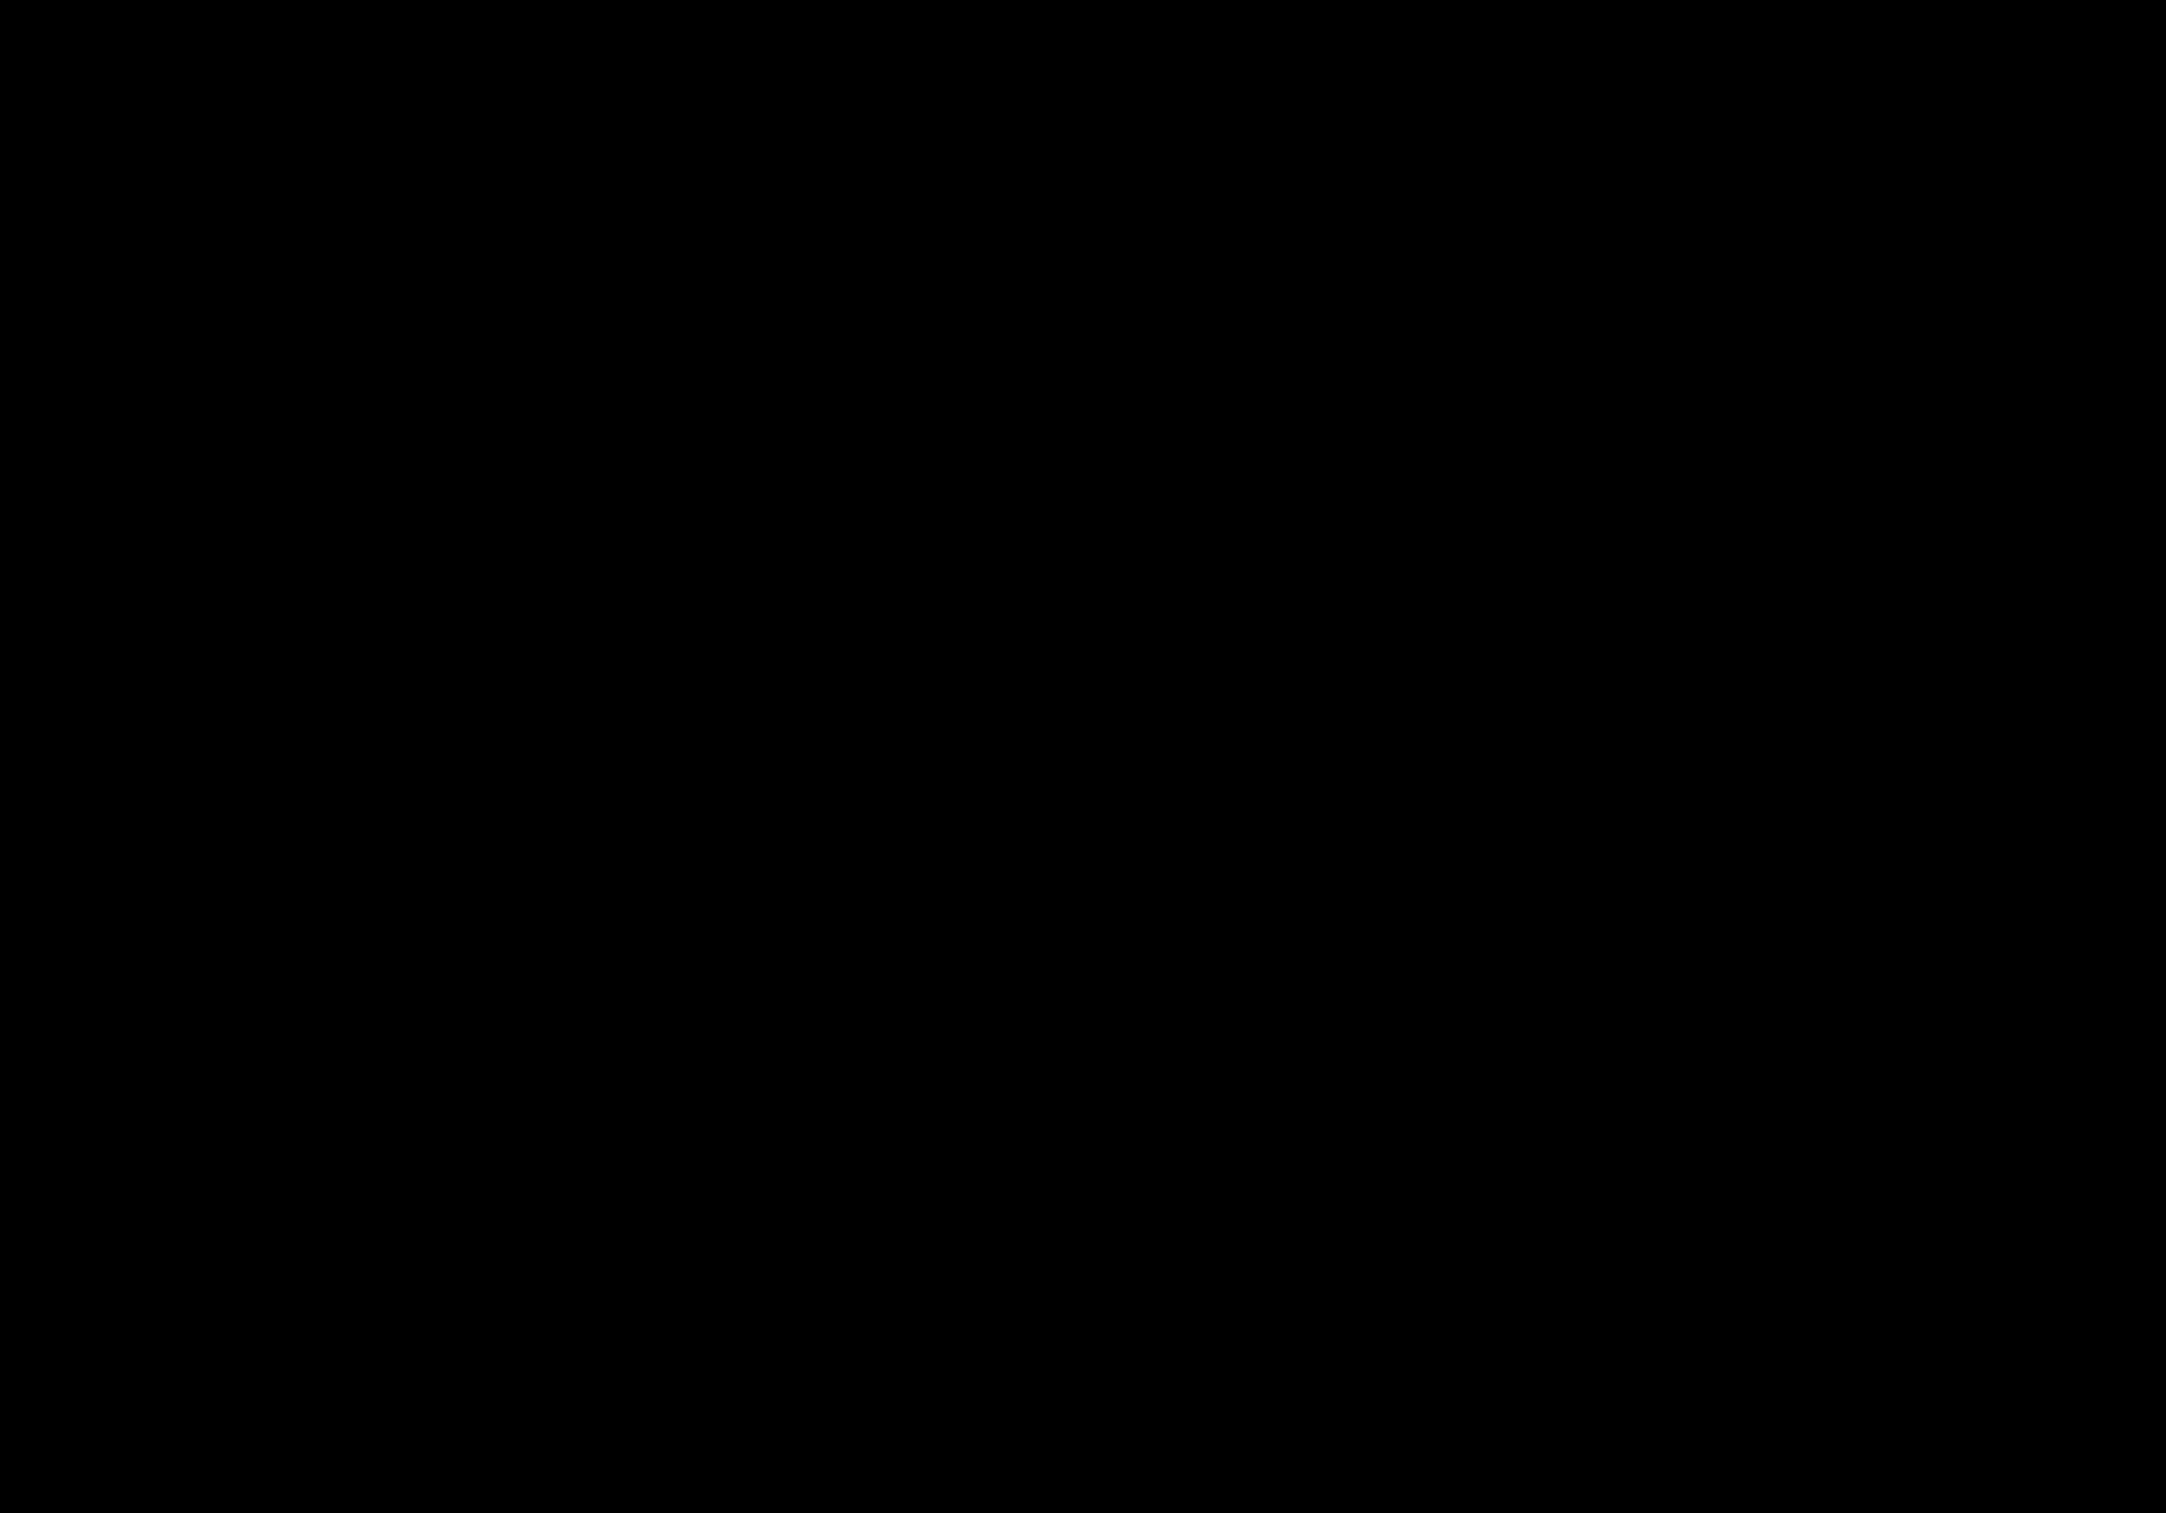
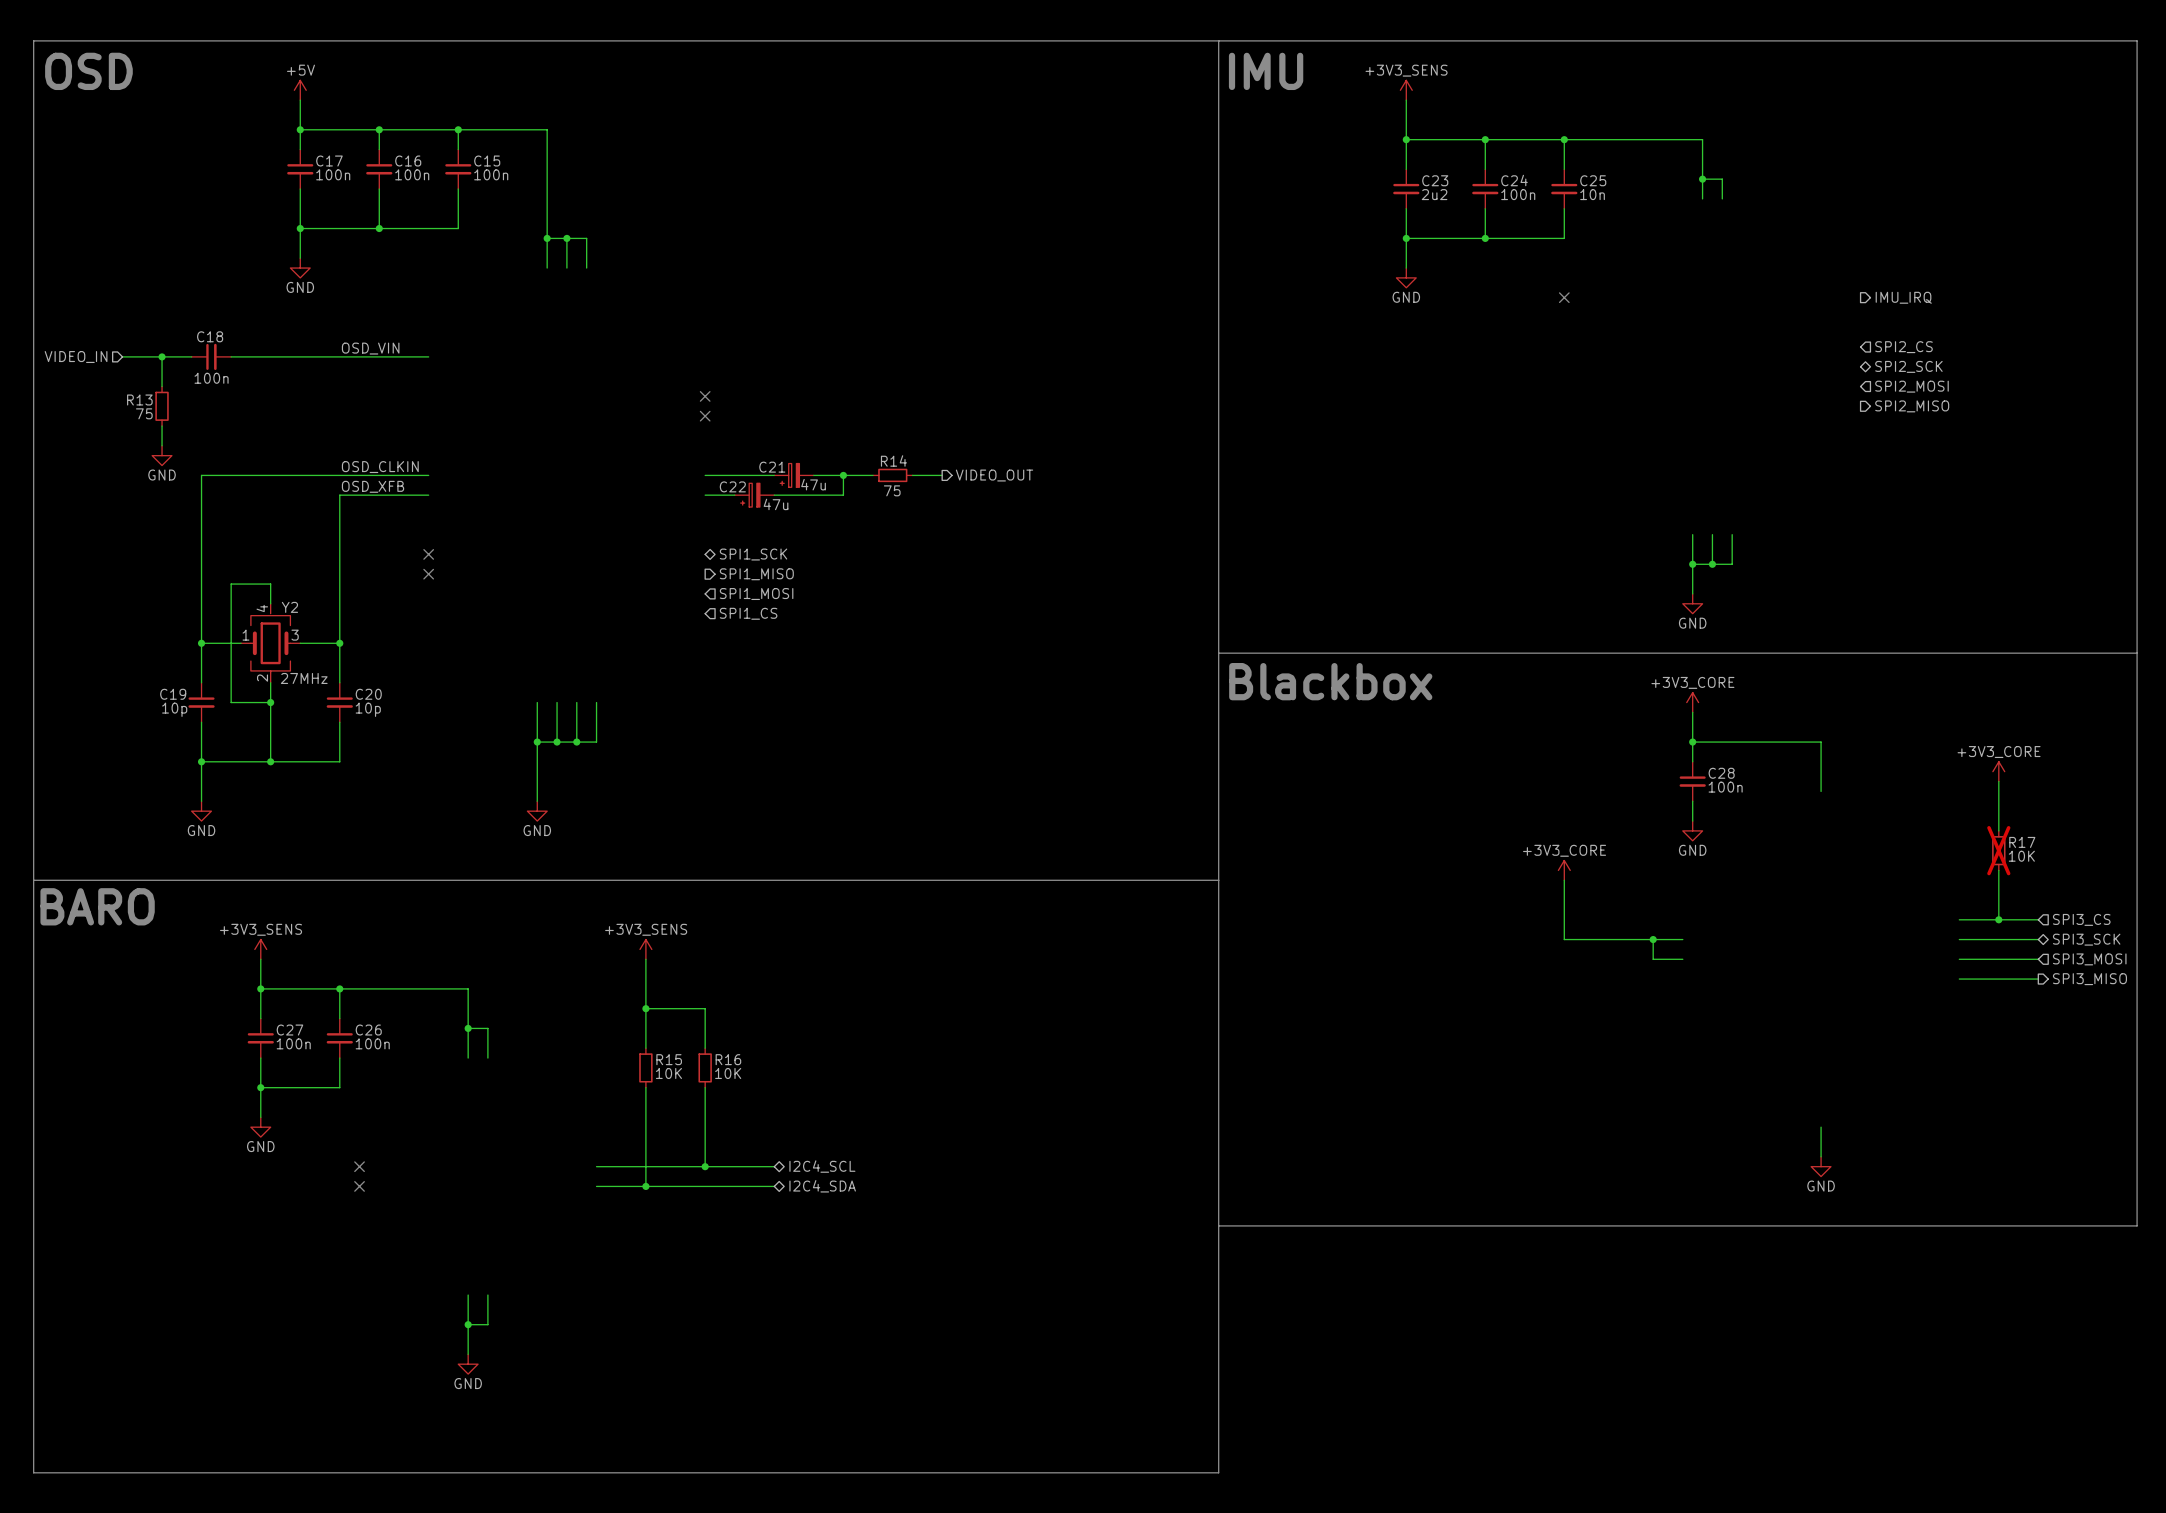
line: none -> (1218, 40) (1218, 1472) (33, 1472) (33, 40) (2137, 40) (2137, 1225) (1218, 1225)
text: none -> OSD (88, 71)
text: none -> IMU (1266, 71)
power symbol: none -> +5V (300, 90)
power symbol: none -> +3V3_SENS (1406, 90)
wire: none -> (300, 100) (300, 149)
wire: none -> (1406, 100) (1406, 169)
wire: none -> (300, 129) (547, 129) (547, 268)
junction: none -> (300, 129)
wire: none -> (379, 129) (379, 149)
junction: none -> (379, 129)
wire: none -> (458, 129) (458, 149)
junction: none -> (458, 129)
wire: none -> (1406, 139) (1702, 139) (1702, 198)
junction: none -> (1406, 139)
wire: none -> (1485, 139) (1485, 169)
junction: none -> (1485, 139)
wire: none -> (1564, 139) (1564, 169)
junction: none -> (1564, 139)
C17: none -> 100n (300, 169)
C16: none -> 100n (379, 169)
C15: none -> 100n (458, 169)
wire: none -> (1702, 179) (1722, 179) (1722, 198)
junction: none -> (1702, 179)
wire: none -> (300, 189) (300, 258)
wire: none -> (379, 189) (379, 228)
wire: none -> (458, 189) (458, 228) (300, 228)
C23: none -> 2u2 (1406, 189)
C24: none -> 100n (1485, 189)
C25: none -> 10n (1564, 189)
wire: none -> (1406, 208) (1406, 268)
wire: none -> (1485, 208) (1485, 238)
wire: none -> (1564, 208) (1564, 238) (1406, 238)
junction: none -> (300, 228)
junction: none -> (379, 228)
wire: none -> (547, 238) (586, 238) (586, 268)
junction: none -> (547, 238)
wire: none -> (566, 238) (566, 268)
junction: none -> (566, 238)
junction: none -> (1406, 238)
junction: none -> (1485, 238)
power symbol: none -> GND (300, 268)
power symbol: none -> GND (1406, 277)
no-connect mark: none -> (1564, 297)
hierarchical label: none -> IMU_IRQ (1903, 297)
hierarchical label: none -> SPI2_CS (1903, 347)
label: none -> OSD_VIN (370, 348)
wire: none -> (122, 356) (191, 356)
wire: none -> (162, 356) (162, 386)
junction: none -> (162, 356)
C18: none -> 100n (211, 356)
wire: none -> (231, 356) (428, 356)
hierarchical label: none -> VIDEO_IN (76, 357)
hierarchical label: none -> SPI2_SCK (1908, 366)
hierarchical label: none -> SPI2_MOSI (1911, 386)
no-connect mark: none -> (705, 396)
R13: none -> 75 (162, 406)
hierarchical label: none -> SPI2_MISO (1912, 406)
no-connect mark: none -> (705, 416)
wire: none -> (162, 426) (162, 445)
power symbol: none -> GND (162, 455)
label: none -> OSD_CLKIN (380, 467)
wire: none -> (428, 475) (201, 475) (201, 682)
wire: none -> (705, 475) (774, 475)
C21: none -> 47u (794, 475)
wire: none -> (813, 475) (873, 475)
wire: none -> (843, 475) (843, 495) (774, 495)
junction: none -> (843, 475)
R14: none -> 75 (892, 475)
wire: none -> (912, 475) (942, 475)
hierarchical label: none -> VIDEO_OUT (994, 475)
label: none -> OSD_XFB (373, 486)
wire: none -> (428, 495) (339, 495) (339, 682)
wire: none -> (705, 495) (734, 495)
C22: none -> 47u (754, 495)
wire: none -> (1692, 534) (1692, 593)
wire: none -> (1712, 534) (1712, 564)
wire: none -> (1732, 534) (1732, 564) (1692, 564)
no-connect mark: none -> (428, 554)
hierarchical label: none -> SPI1_SCK (753, 554)
junction: none -> (1692, 564)
junction: none -> (1712, 564)
no-connect mark: none -> (428, 574)
hierarchical label: none -> SPI1_MISO (756, 574)
hierarchical label: none -> SPI1_MOSI (756, 594)
wire: none -> (270, 603) (270, 584) (231, 584) (231, 702) (270, 702)
power symbol: none -> GND (1692, 603)
hierarchical label: none -> SPI1_CS (748, 613)
wire: none -> (201, 643) (241, 643)
junction: none -> (201, 643)
Y2: none -> 27MHz (270, 643)
wire: none -> (300, 643) (339, 643)
junction: none -> (339, 643)
line: none -> (1218, 653) (2137, 653)
text: none -> Blackbox (1330, 681)
wire: none -> (270, 682) (270, 761)
C19: none -> 10p (201, 702)
junction: none -> (270, 702)
C20: none -> 10p (339, 702)
wire: none -> (537, 702) (537, 801)
wire: none -> (557, 702) (557, 742)
wire: none -> (576, 702) (576, 742)
wire: none -> (596, 702) (596, 742) (537, 742)
power symbol: none -> +3V3_CORE (1692, 702)
wire: none -> (1692, 712) (1692, 761)
wire: none -> (201, 722) (201, 801)
wire: none -> (339, 722) (339, 761) (201, 761)
junction: none -> (537, 742)
junction: none -> (557, 742)
junction: none -> (576, 742)
wire: none -> (1692, 742) (1821, 742) (1821, 791)
junction: none -> (1692, 742)
junction: none -> (201, 761)
junction: none -> (270, 761)
power symbol: none -> +3V3_CORE (1998, 771)
C28: none -> 100n (1692, 781)
wire: none -> (1998, 781) (1998, 830)
wire: none -> (1692, 801) (1692, 821)
power symbol: none -> GND (201, 811)
power symbol: none -> GND (537, 811)
power symbol: none -> GND (1692, 830)
R17: none -> 10K (1998, 850)
power symbol: none -> +3V3_CORE (1564, 870)
wire: none -> (1998, 870) (1998, 919)
line: none -> (33, 880) (1218, 880)
wire: none -> (1564, 880) (1564, 939) (1682, 939)
text: none -> BARO (97, 906)
wire: none -> (1959, 919) (2038, 919)
junction: none -> (1998, 919)
hierarchical label: none -> SPI3_CS (2081, 919)
wire: none -> (1653, 939) (1653, 959) (1682, 959)
junction: none -> (1653, 939)
wire: none -> (1959, 939) (2038, 939)
hierarchical label: none -> SPI3_SCK (2086, 939)
power symbol: none -> +3V3_SENS (260, 949)
power symbol: none -> +3V3_SENS (645, 949)
wire: none -> (260, 959) (260, 1018)
wire: none -> (645, 959) (645, 1048)
wire: none -> (1959, 959) (2038, 959)
hierarchical label: none -> SPI3_MOSI (2089, 959)
wire: none -> (1959, 979) (2038, 979)
hierarchical label: none -> SPI3_MISO (2089, 979)
wire: none -> (260, 988) (468, 988) (468, 1058)
junction: none -> (260, 988)
wire: none -> (339, 988) (339, 1018)
junction: none -> (339, 988)
wire: none -> (645, 1008) (705, 1008) (705, 1048)
junction: none -> (645, 1008)
wire: none -> (468, 1028) (487, 1028) (487, 1058)
junction: none -> (468, 1028)
C27: none -> 100n (260, 1038)
C26: none -> 100n (339, 1038)
wire: none -> (260, 1058) (260, 1117)
wire: none -> (339, 1058) (339, 1087) (260, 1087)
R15: none -> 10K (645, 1067)
R16: none -> 10K (705, 1067)
junction: none -> (260, 1087)
wire: none -> (645, 1087) (645, 1186)
wire: none -> (705, 1087) (705, 1166)
power symbol: none -> GND (260, 1127)
wire: none -> (1821, 1127) (1821, 1156)
no-connect mark: none -> (359, 1166)
wire: none -> (596, 1166) (774, 1166)
junction: none -> (705, 1166)
hierarchical label: none -> I2C4_SCL (822, 1166)
power symbol: none -> GND (1821, 1166)
no-connect mark: none -> (359, 1186)
wire: none -> (596, 1186) (774, 1186)
junction: none -> (645, 1186)
hierarchical label: none -> I2C4_SDA (822, 1186)
wire: none -> (468, 1295) (468, 1354)
wire: none -> (487, 1295) (487, 1324) (468, 1324)
junction: none -> (468, 1324)
power symbol: none -> GND (468, 1364)

